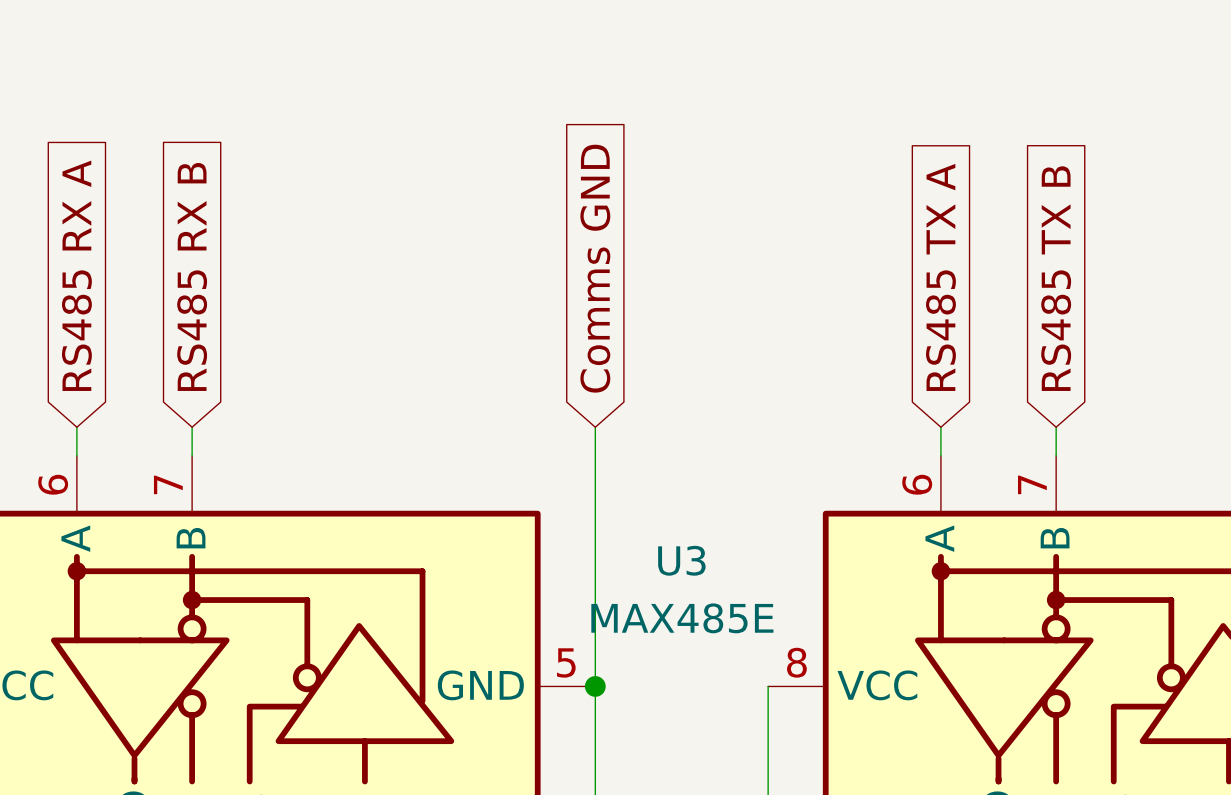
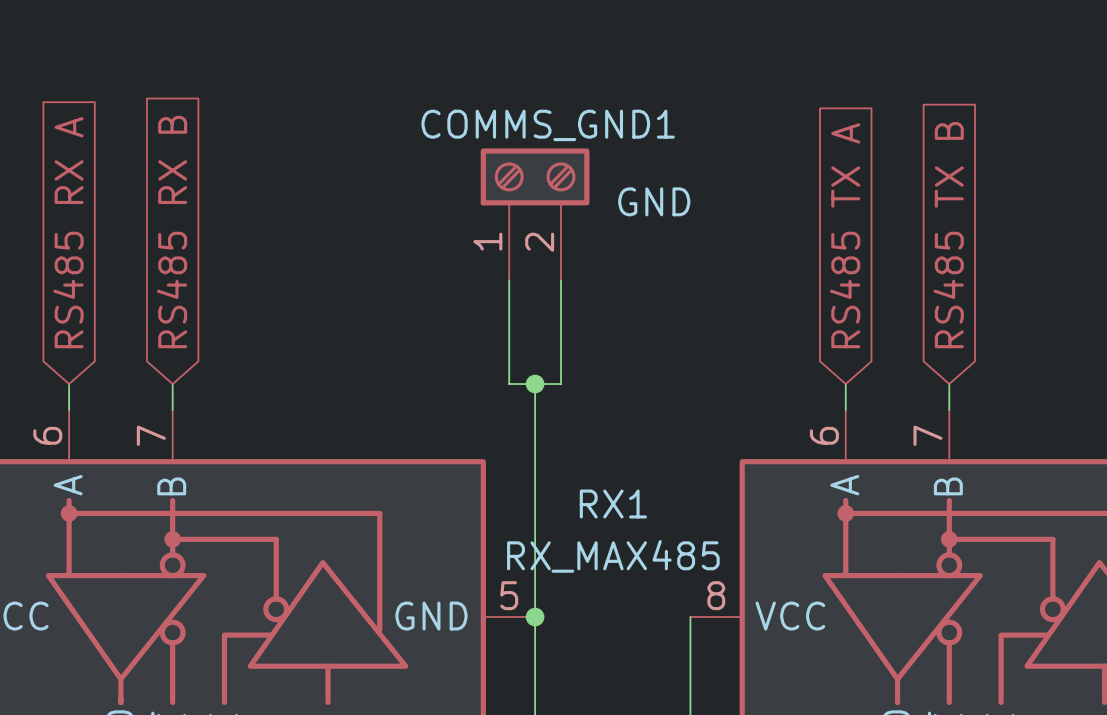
COMMS_GND1: none -> GND (535, 214)
global label: Comms GND (595, 268) -> none
wire: none -> (509, 280) (509, 384) (560, 384) (560, 280)
junction: none -> (535, 384)
U3 name: U3 (681, 560) -> RX1 (613, 504)
U3 value: MAX485E (682, 618) -> RX_MAX485 (613, 556)

